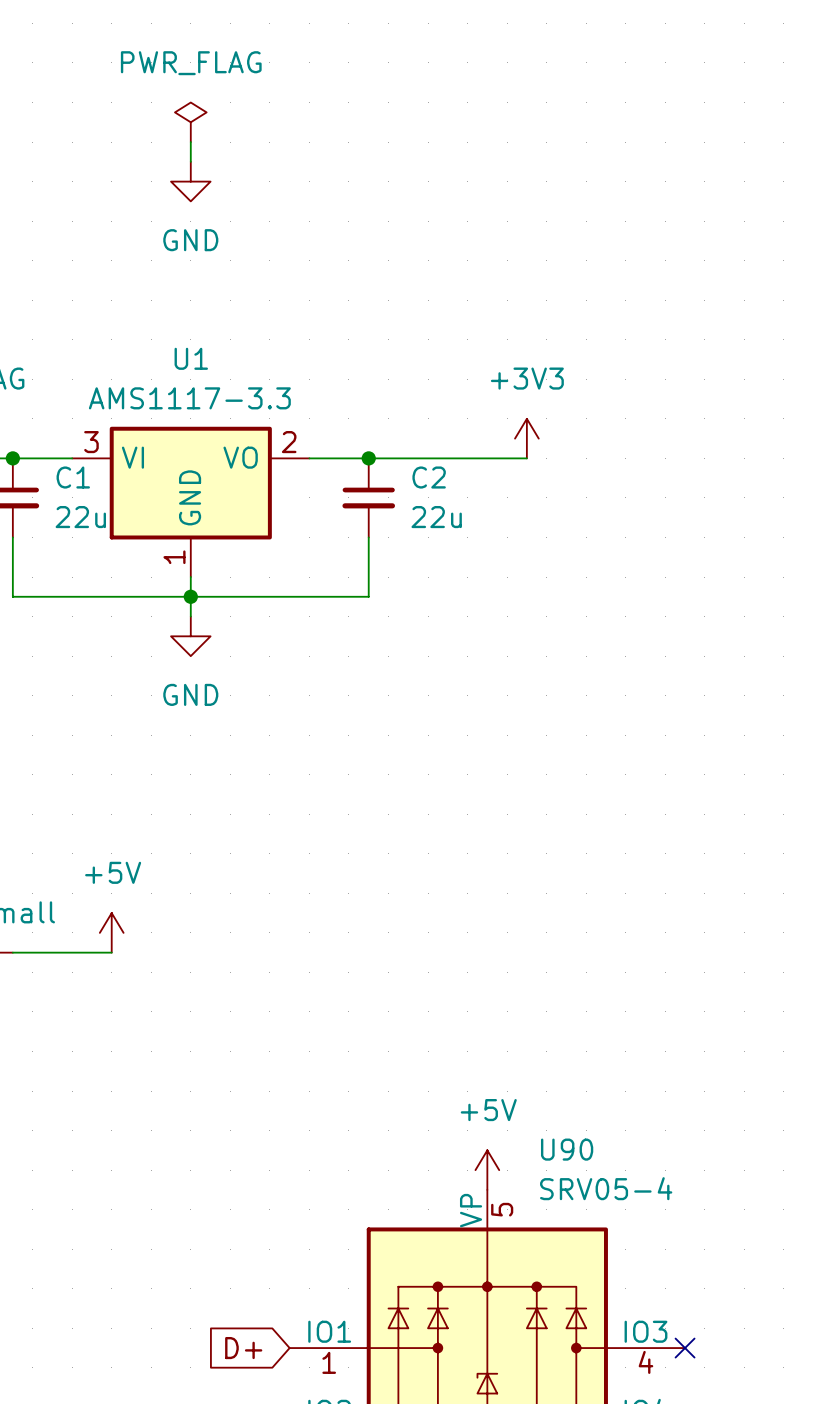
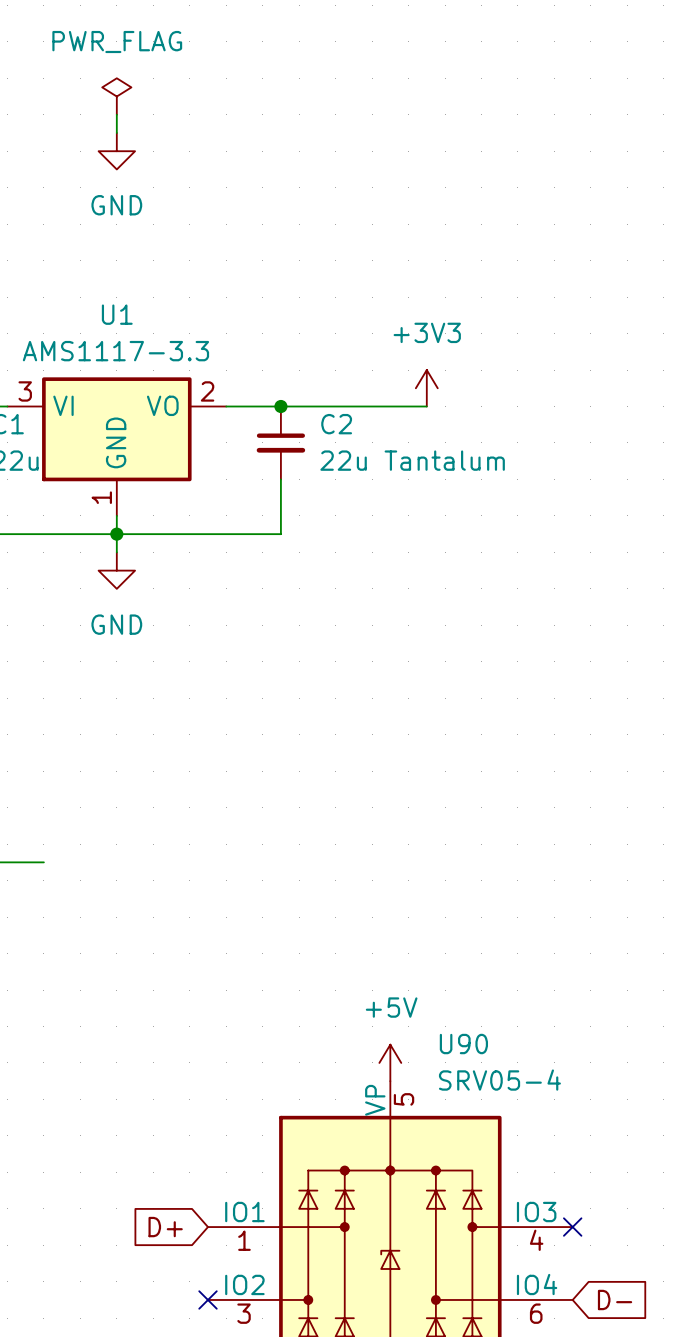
C2 value: 22u (436, 517) -> 22u Tantalum (412, 460)
power symbol: +5V (111, 932) -> none

